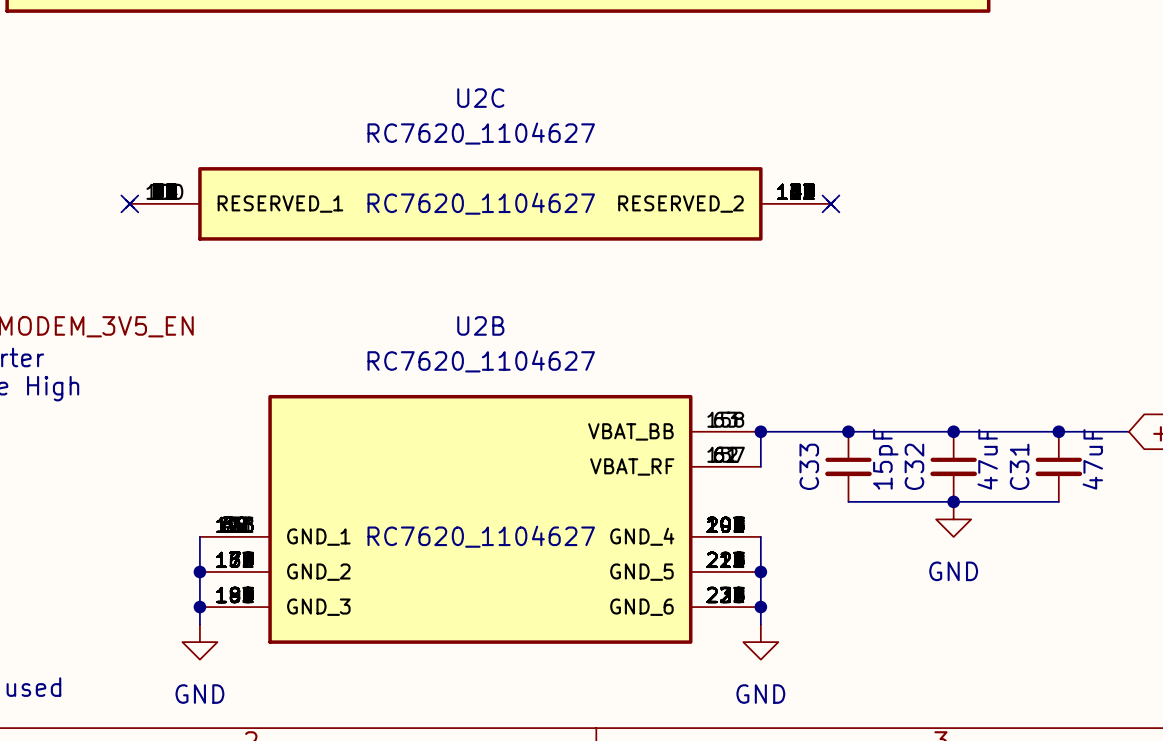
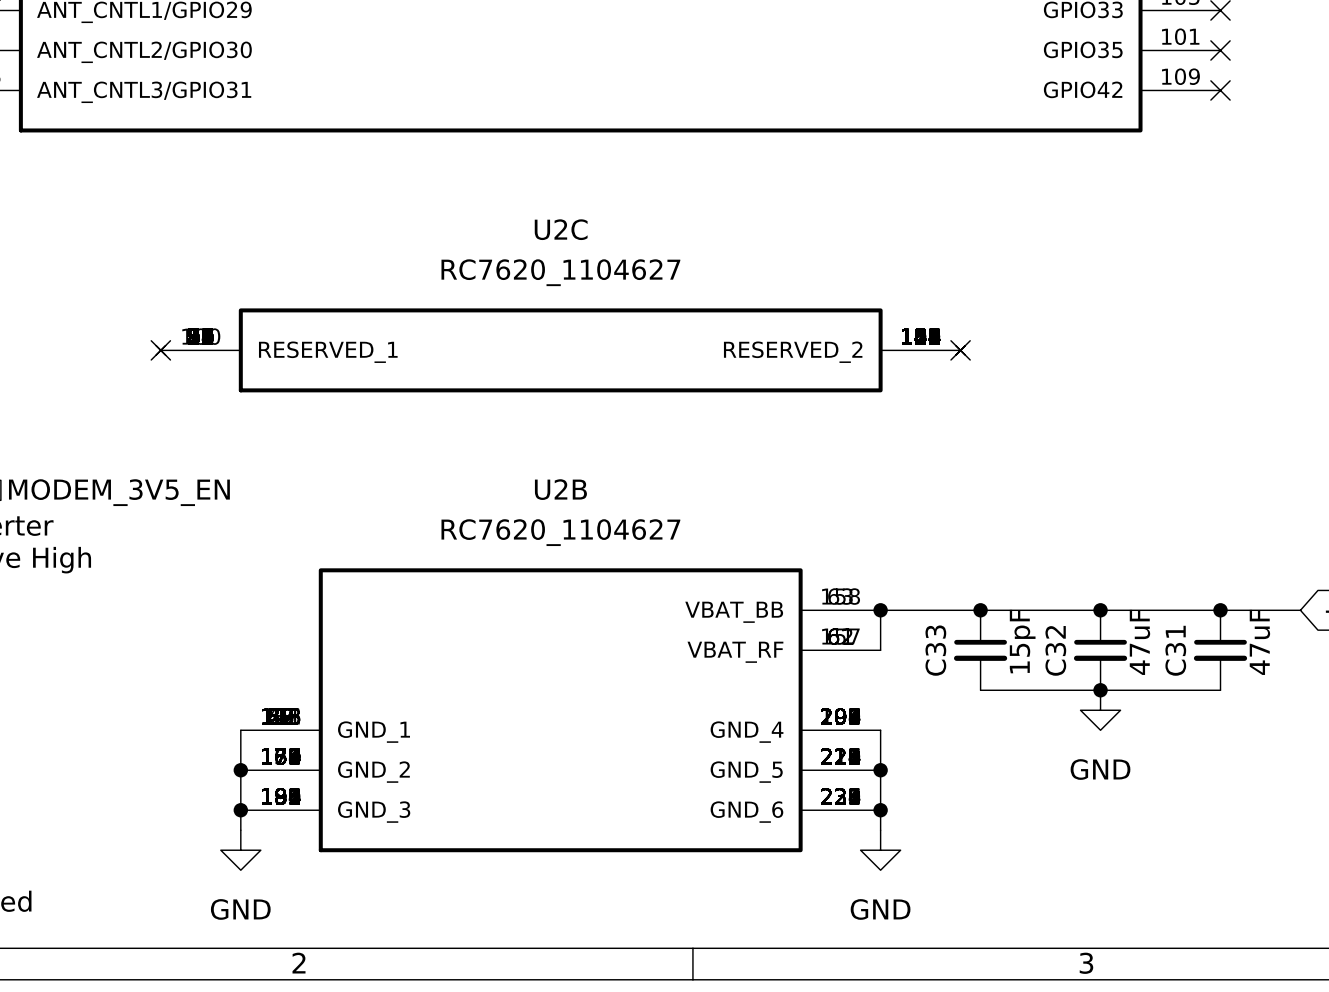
U2C text: RC7620_1104627 (481, 203) -> none
U2B text: RC7620_1104627 (481, 536) -> none

